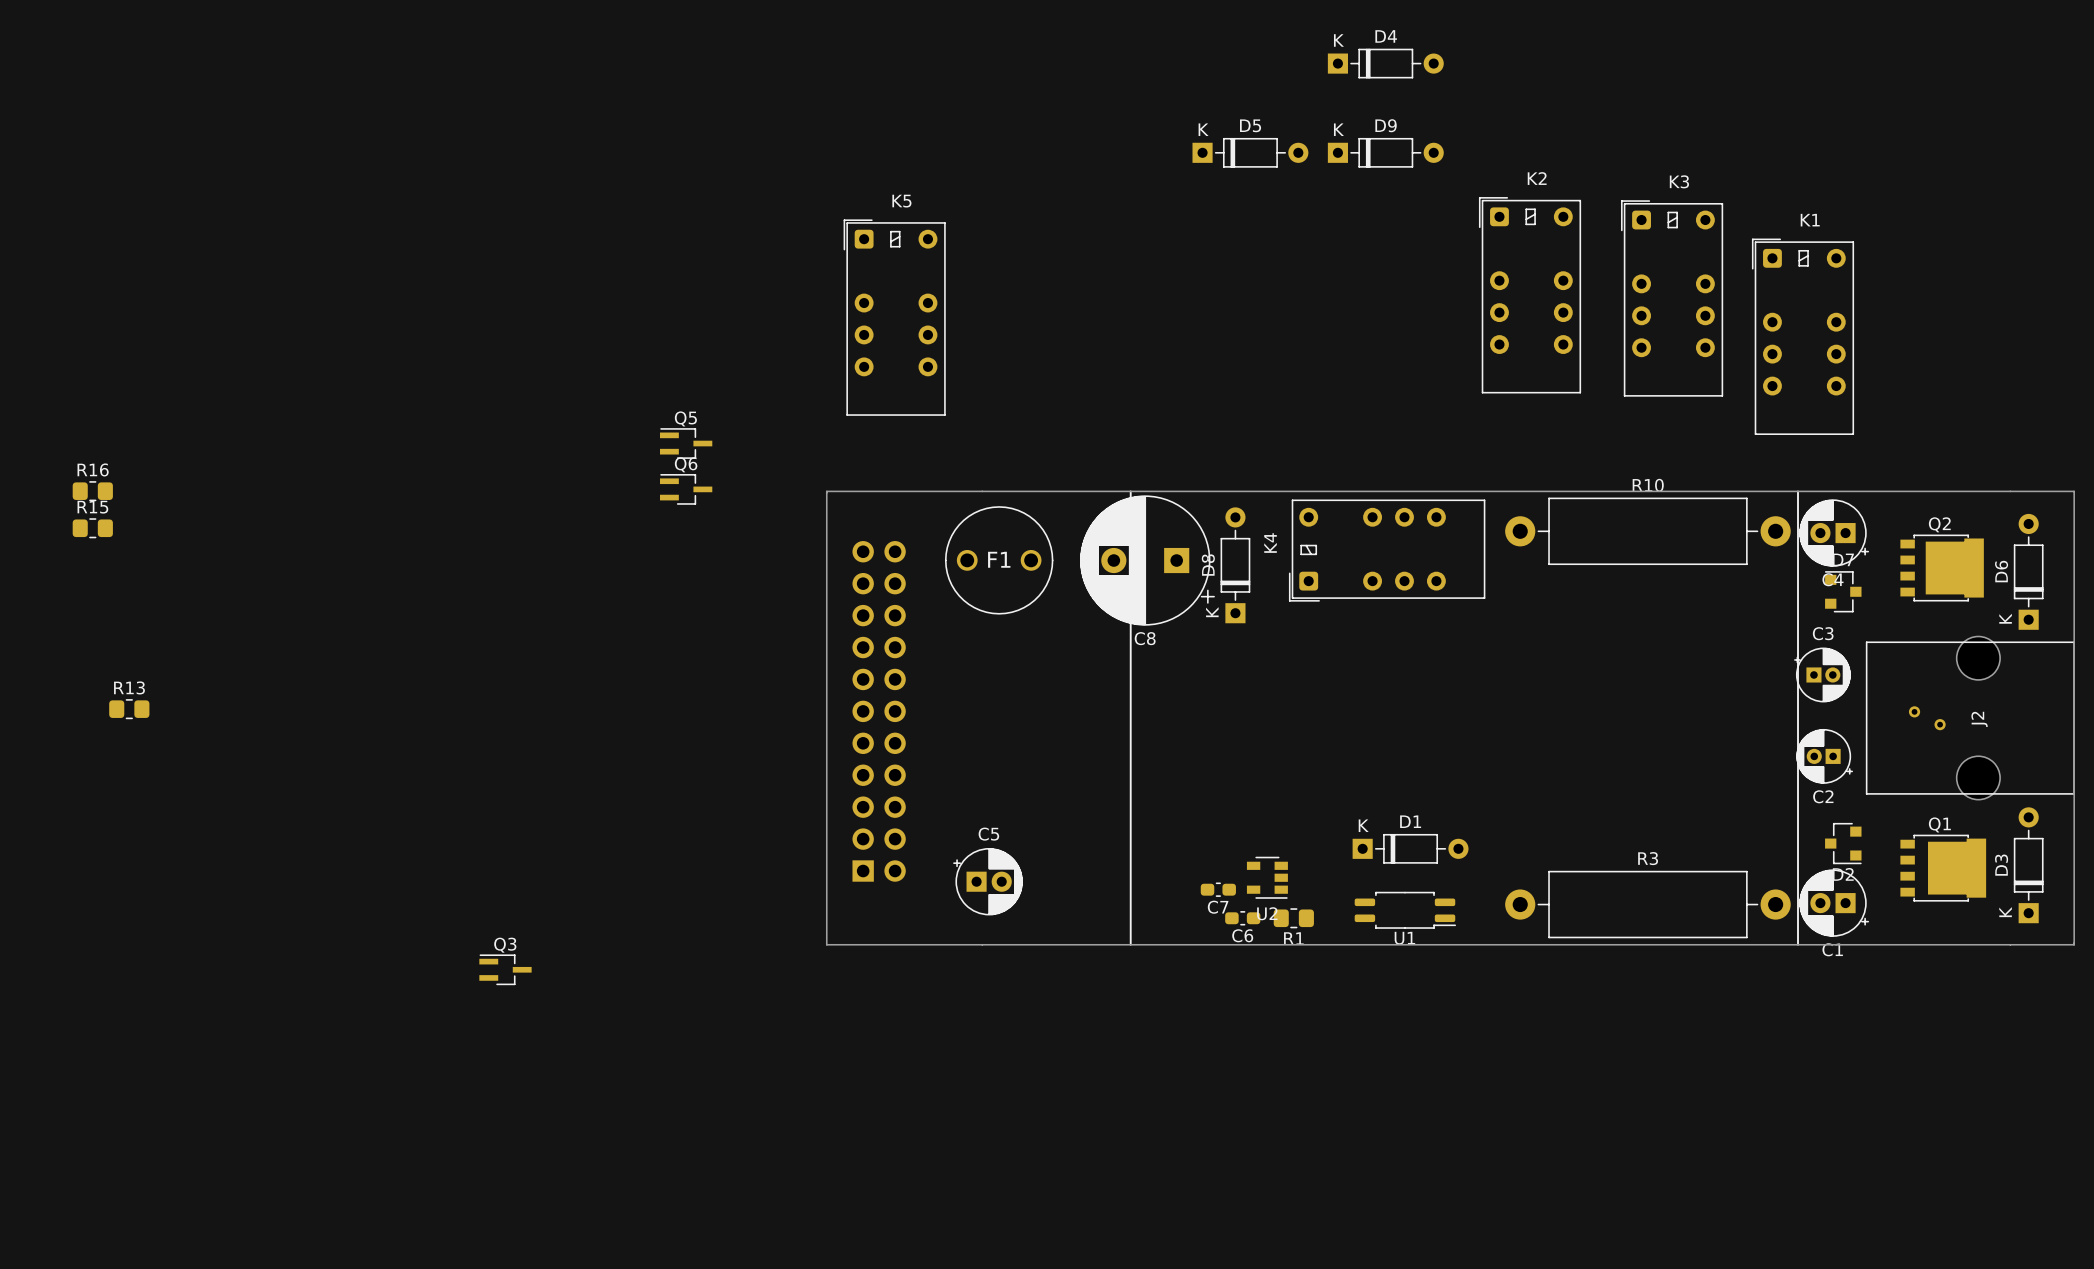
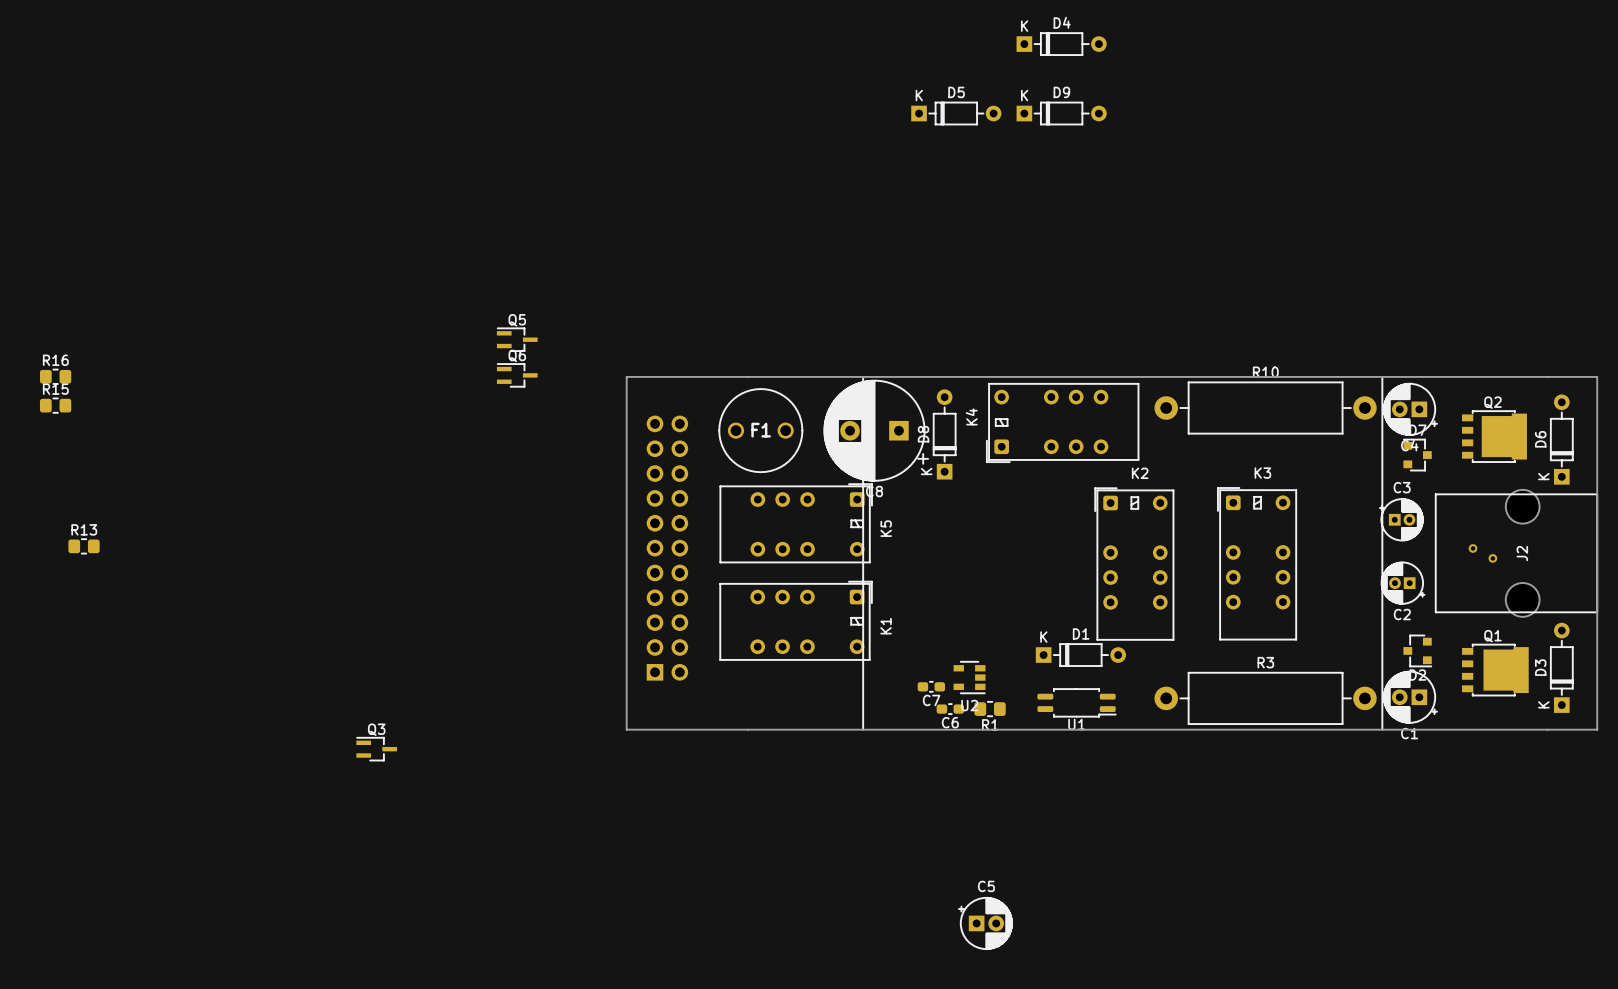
K2 position: (1530, 295) -> (1134, 564)
K3 position: (1672, 298) -> (1257, 563)
K5 rotation: 0° (894, 317) -> 90° clockwise (796, 523)
K5 position: (894, 317) -> (796, 523)
K1 rotation: 0° (1803, 336) -> 90° clockwise (796, 620)
K1 position: (1803, 336) -> (796, 620)
C5 position: (987, 881) -> (985, 923)

